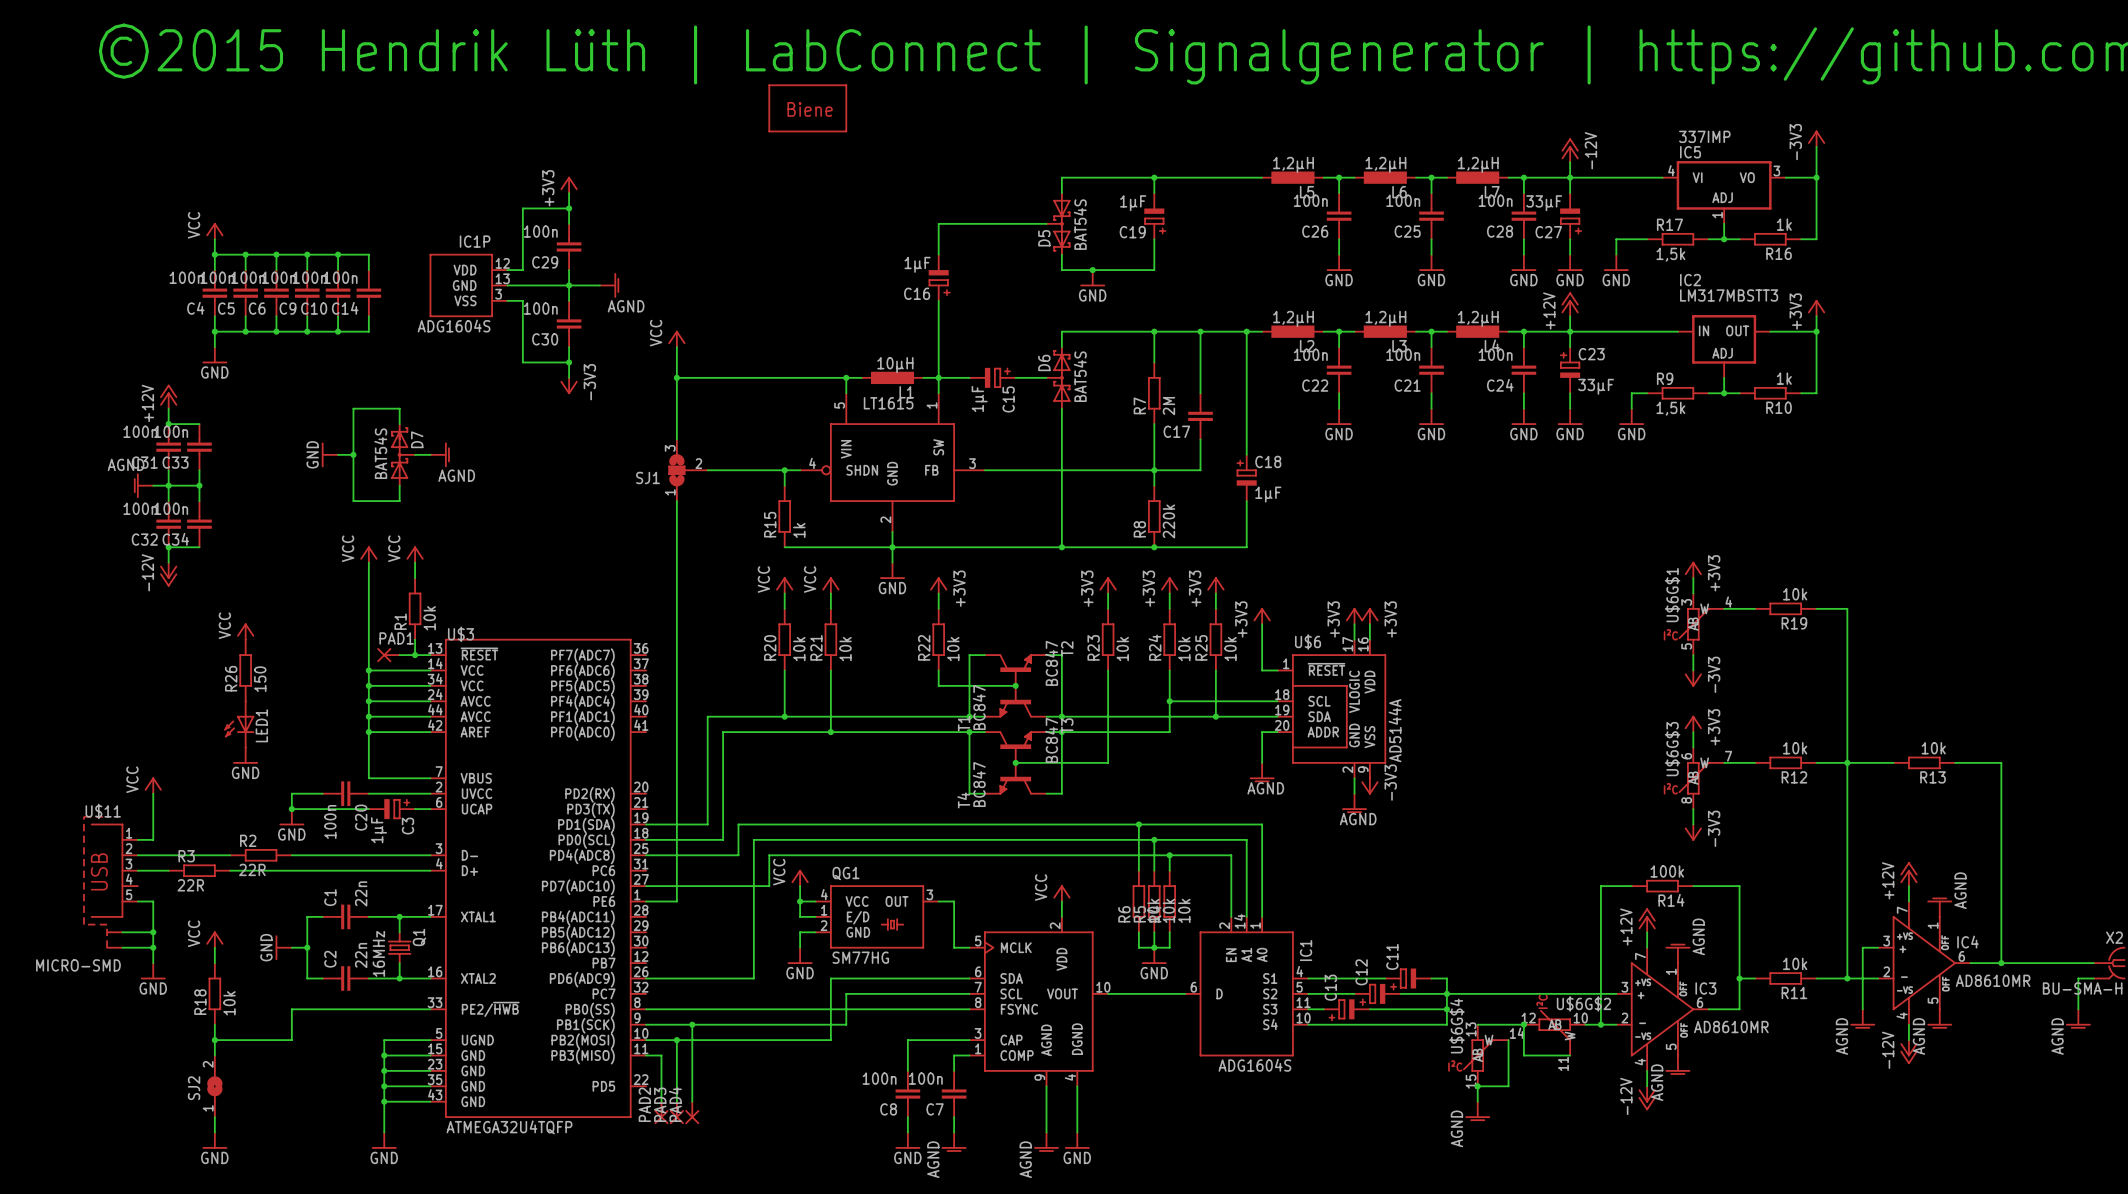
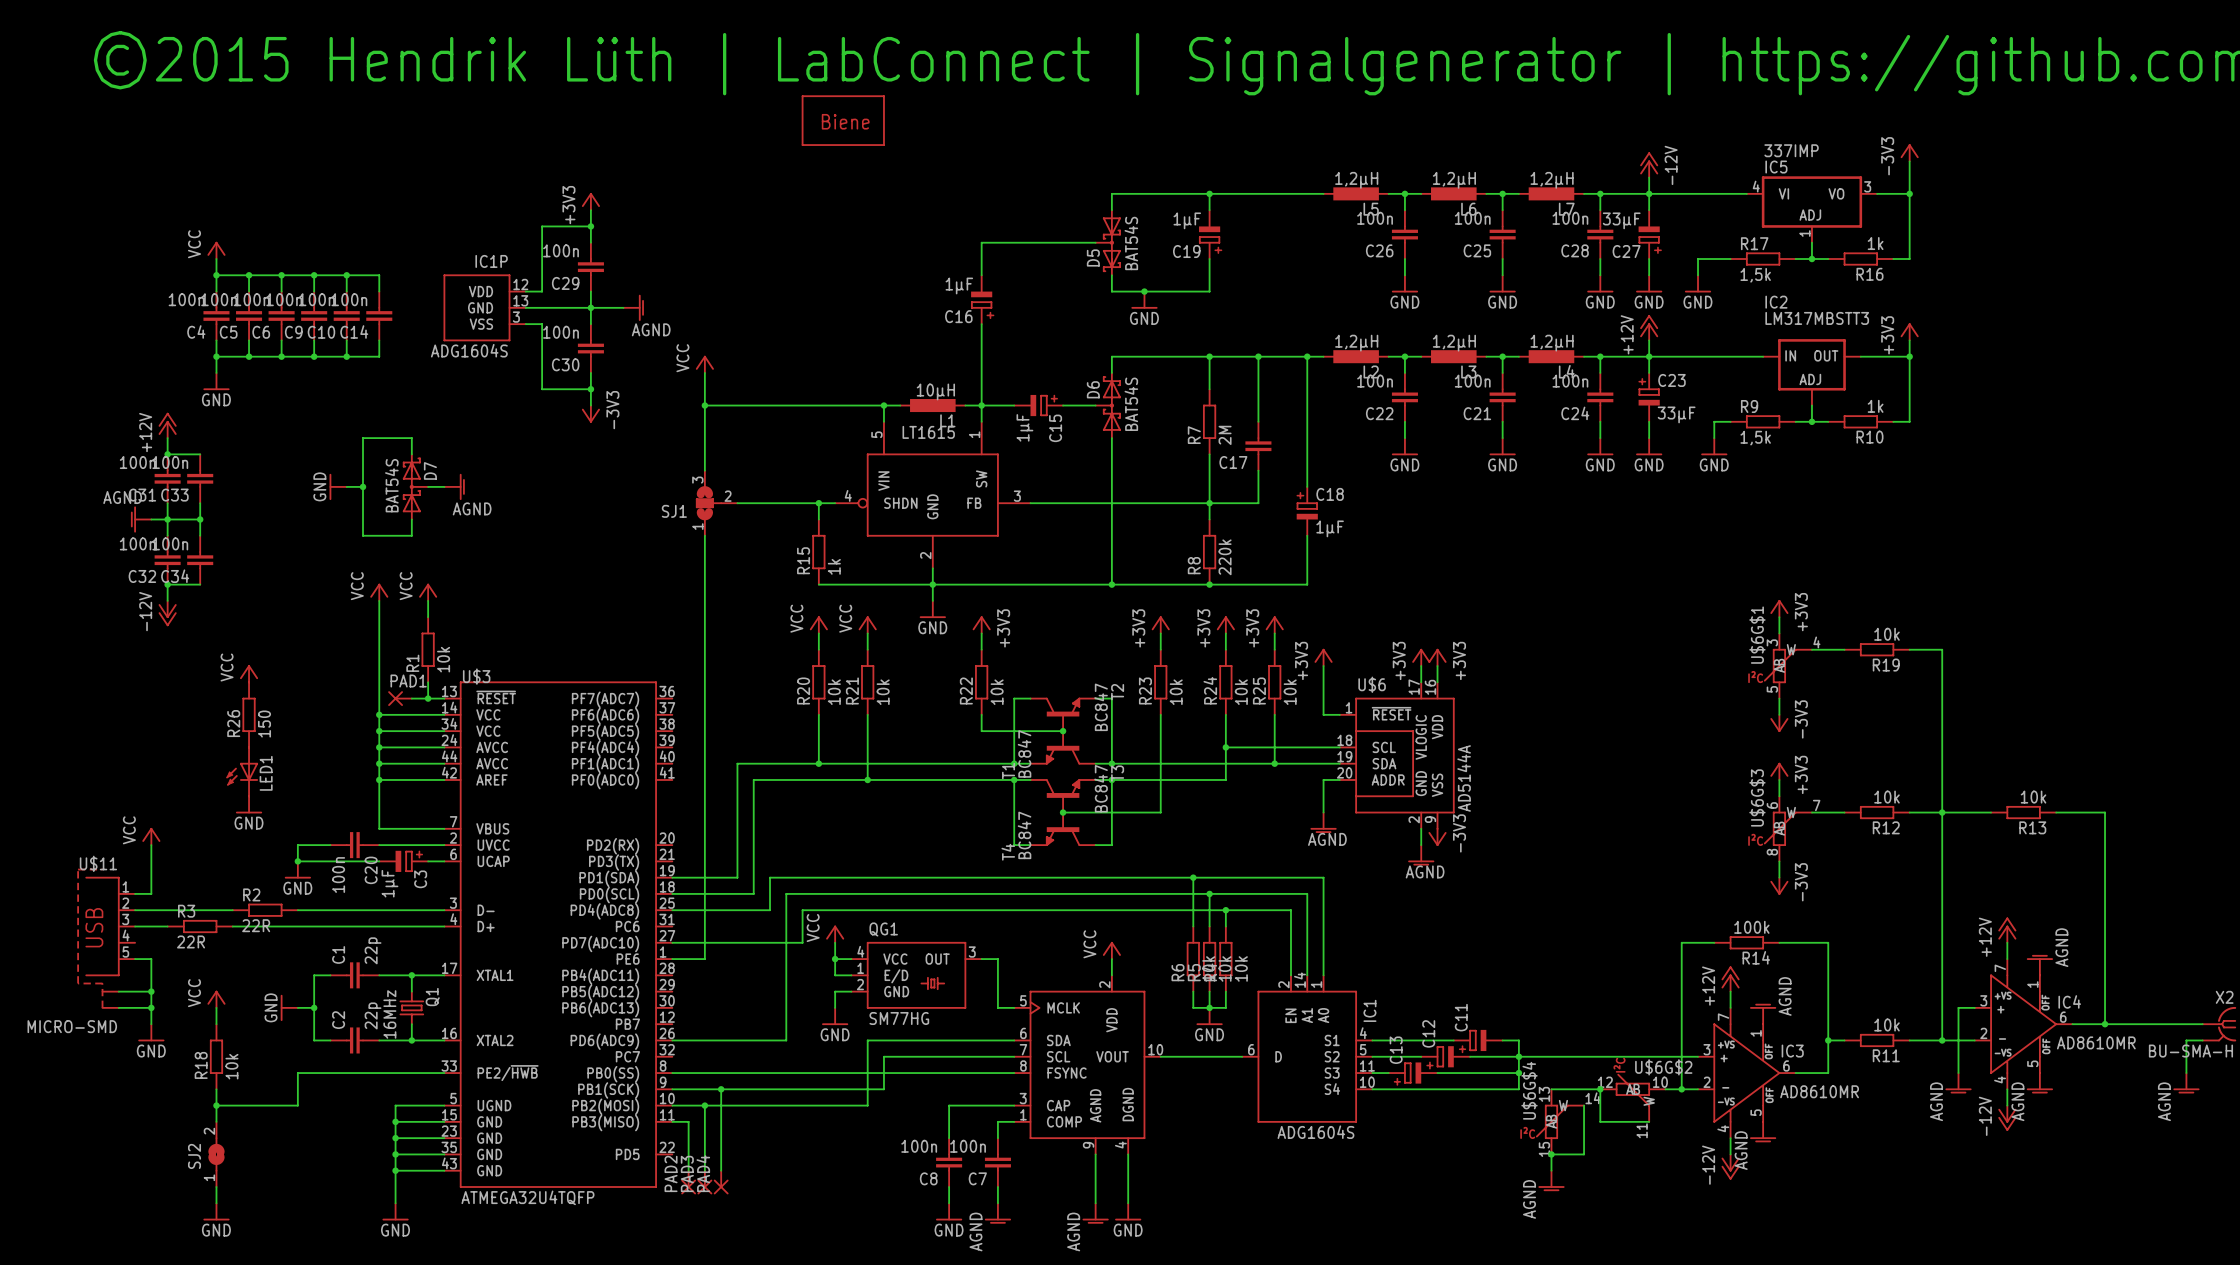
C1 value: 22n (361, 893) -> 22p (373, 950)
C2 value: 22n (361, 955) -> 22p (373, 1015)

